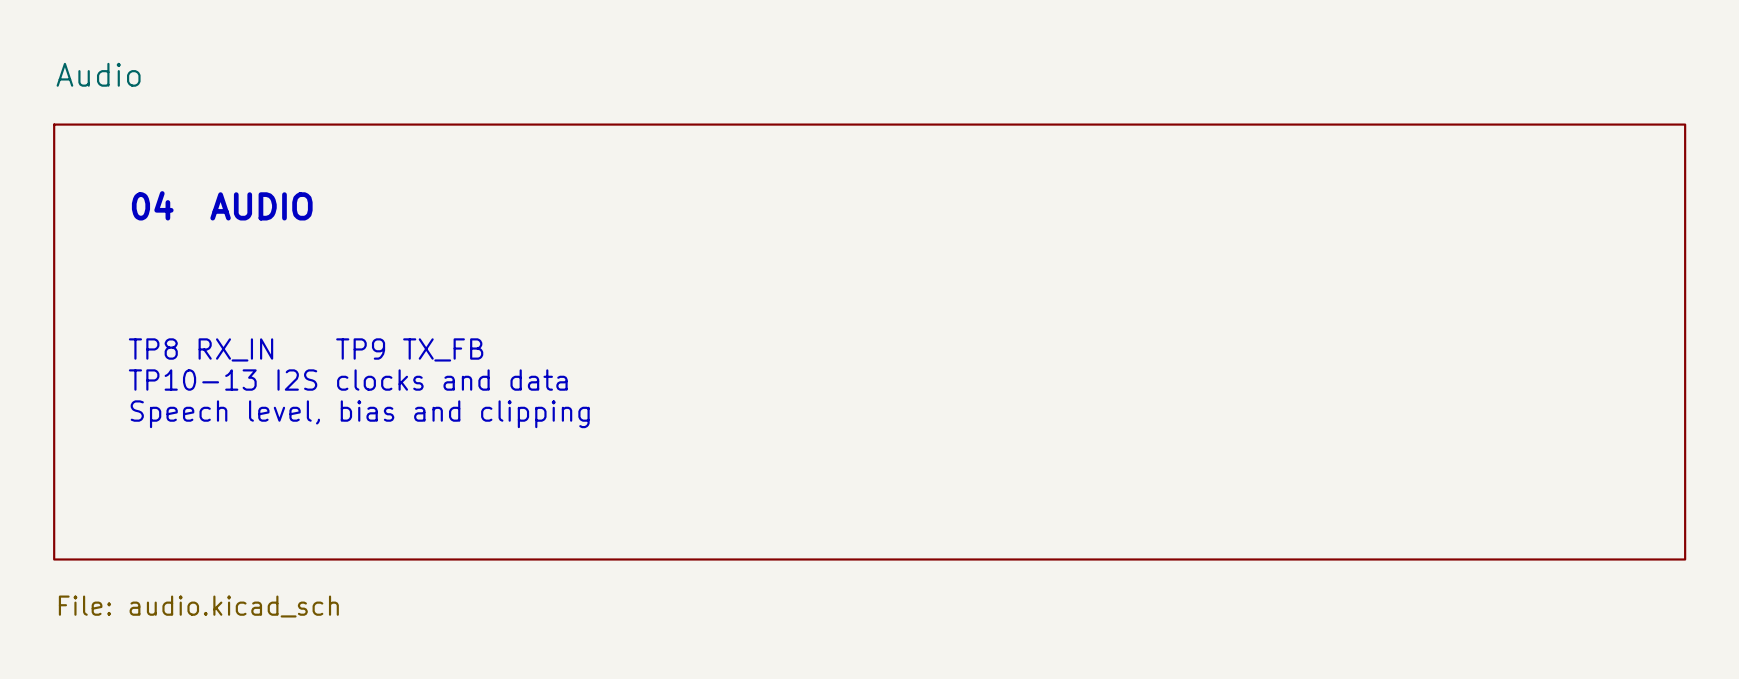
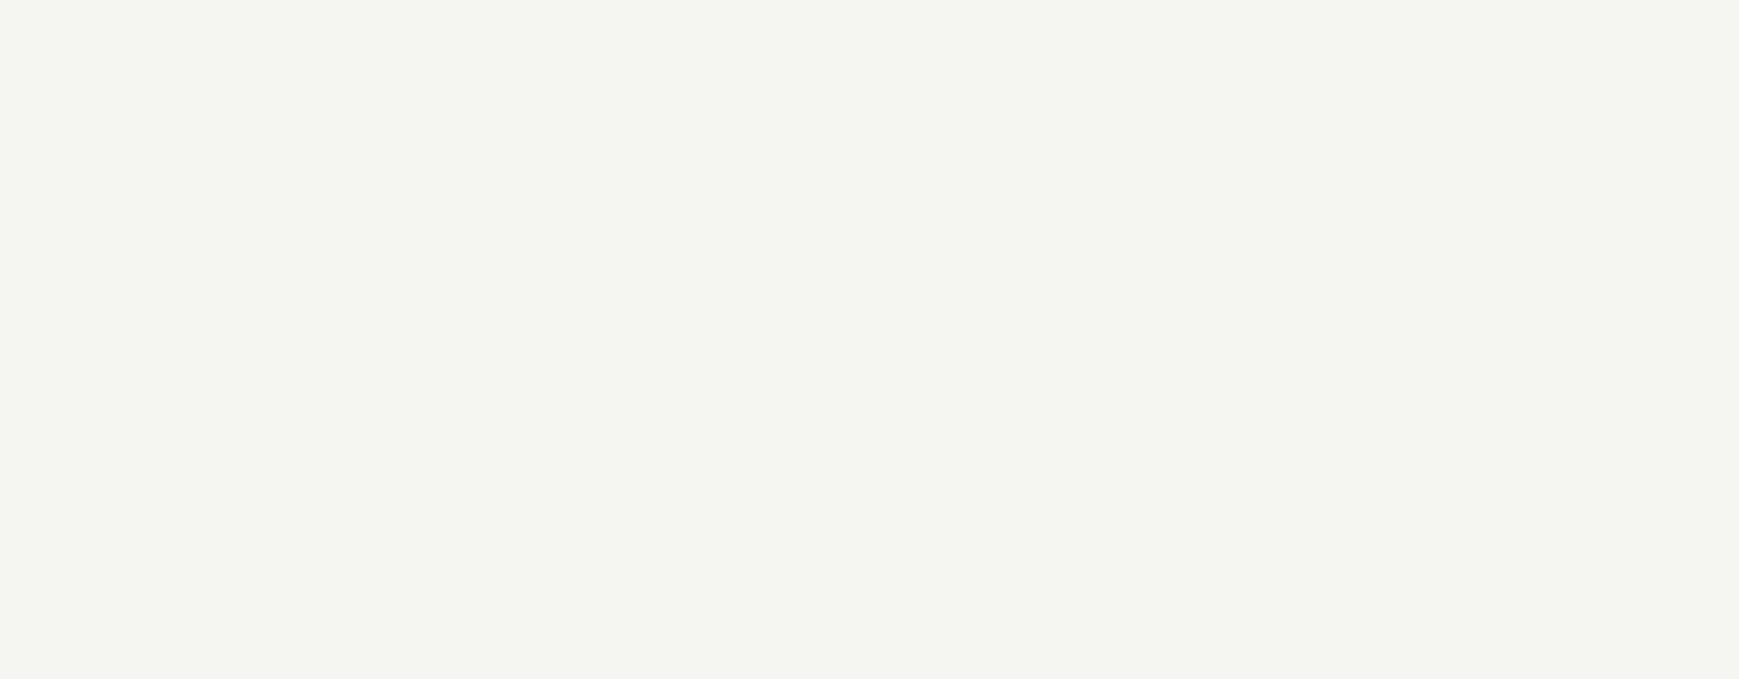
text: 04 AUDIO (222, 205) -> none
sheet Audio: File: audio.kicad_sch (869, 342) -> none
text: TP8 RX_IN TP9 TX_FB (306, 349) -> none
text: TP10-13 I2S clocks and data (348, 380) -> none
text: Speech level, bias and clipping (360, 414) -> none

